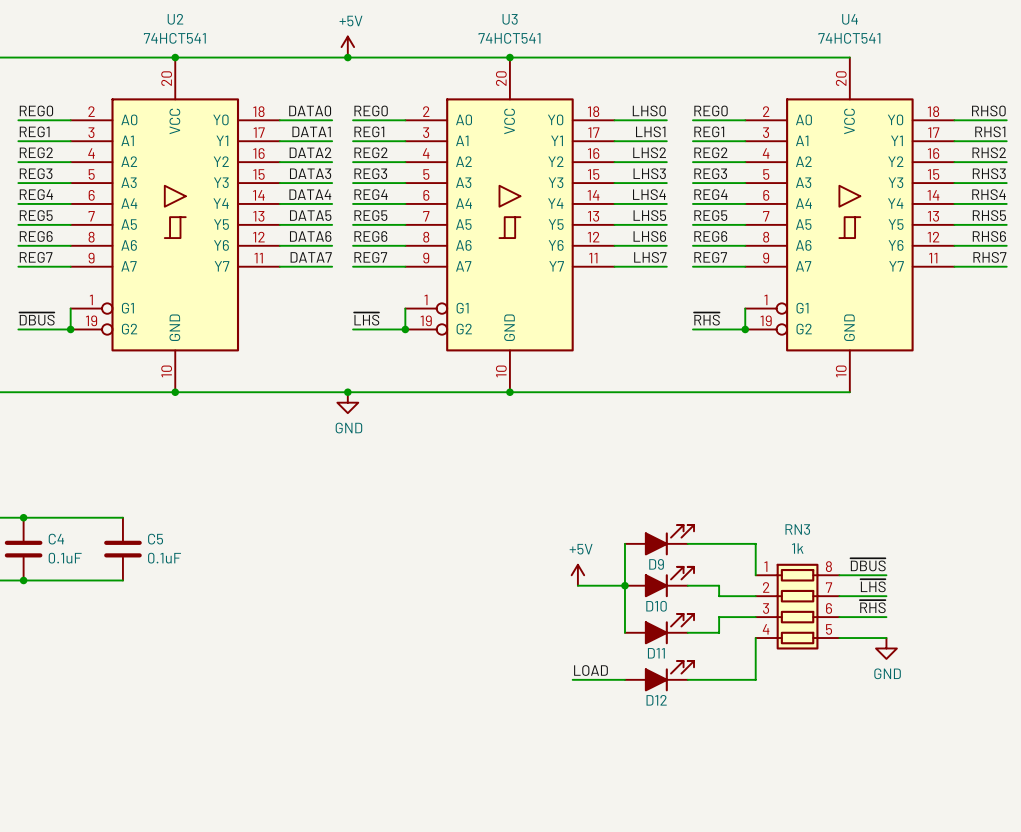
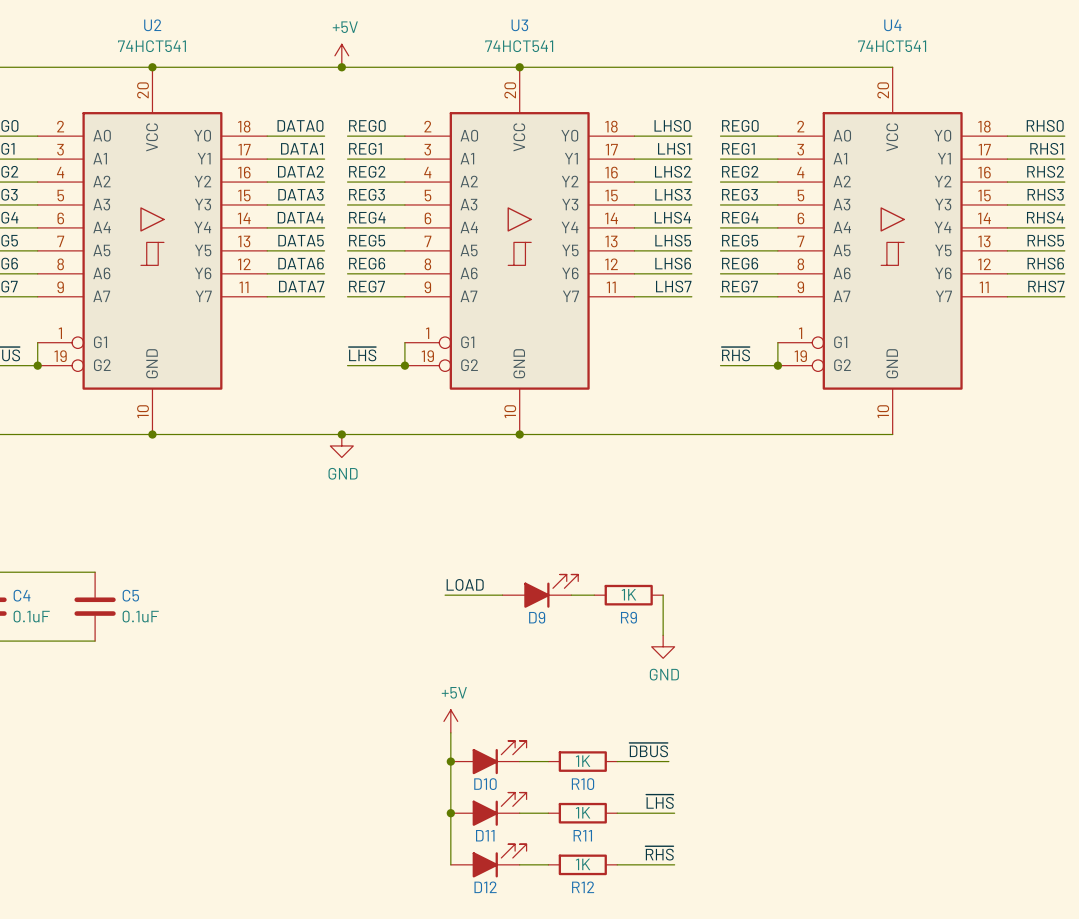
wire: none -> (445, 595) (502, 595)
wire: none -> (571, 595) (594, 595)
R9: none -> 1K (628, 595)
wire: none -> (663, 595) (663, 635)
D9 position: (659, 540) -> (540, 591)
wire: (624, 543) (624, 632) -> none
wire: (687, 543) (755, 543) (755, 575) -> none
label: ~{DBUS} (868, 564) -> none
power symbol position: +5V (577, 575) -> +5V (450, 721)
wire: (839, 575) (886, 575) -> none
D10 position: (659, 582) -> (488, 757)
wire: (577, 585) (624, 585) -> (617, 761) (668, 761)
junction: (624, 585) -> none
power symbol: none -> GND (663, 646)
wire: (687, 585) (719, 585) (719, 596) (755, 596) -> none
label: ~{LHS} (873, 585) -> none
wire: (839, 596) (886, 596) -> none
RN3: 1k (797, 606) -> none
label: ~{RHS} (872, 606) -> none
wire: (755, 617) (719, 617) (719, 632) (687, 632) -> none
wire: (839, 617) (886, 617) -> none
D11 position: (659, 629) -> (488, 809)
wire: (755, 638) (755, 679) (687, 679) -> none
wire: (839, 638) (886, 638) -> none
power symbol: GND (886, 648) -> none
wire: none -> (450, 732) (450, 864)
label position: LOAD (590, 670) -> LOAD (465, 584)
D12 position: (659, 676) -> (488, 860)
wire: (572, 679) (624, 679) -> (617, 813) (674, 813)
label: none -> ~{DBUS} (648, 750)
junction: none -> (450, 761)
wire: none -> (519, 761) (548, 761)
R10: none -> 1K (582, 761)
label: none -> ~{LHS} (659, 801)
junction: none -> (450, 813)
wire: none -> (519, 813) (548, 813)
R11: none -> 1K (582, 813)
label: none -> ~{RHS} (659, 853)
wire: none -> (519, 864) (548, 864)
R12: none -> 1K (582, 864)
wire: none -> (617, 864) (674, 864)

